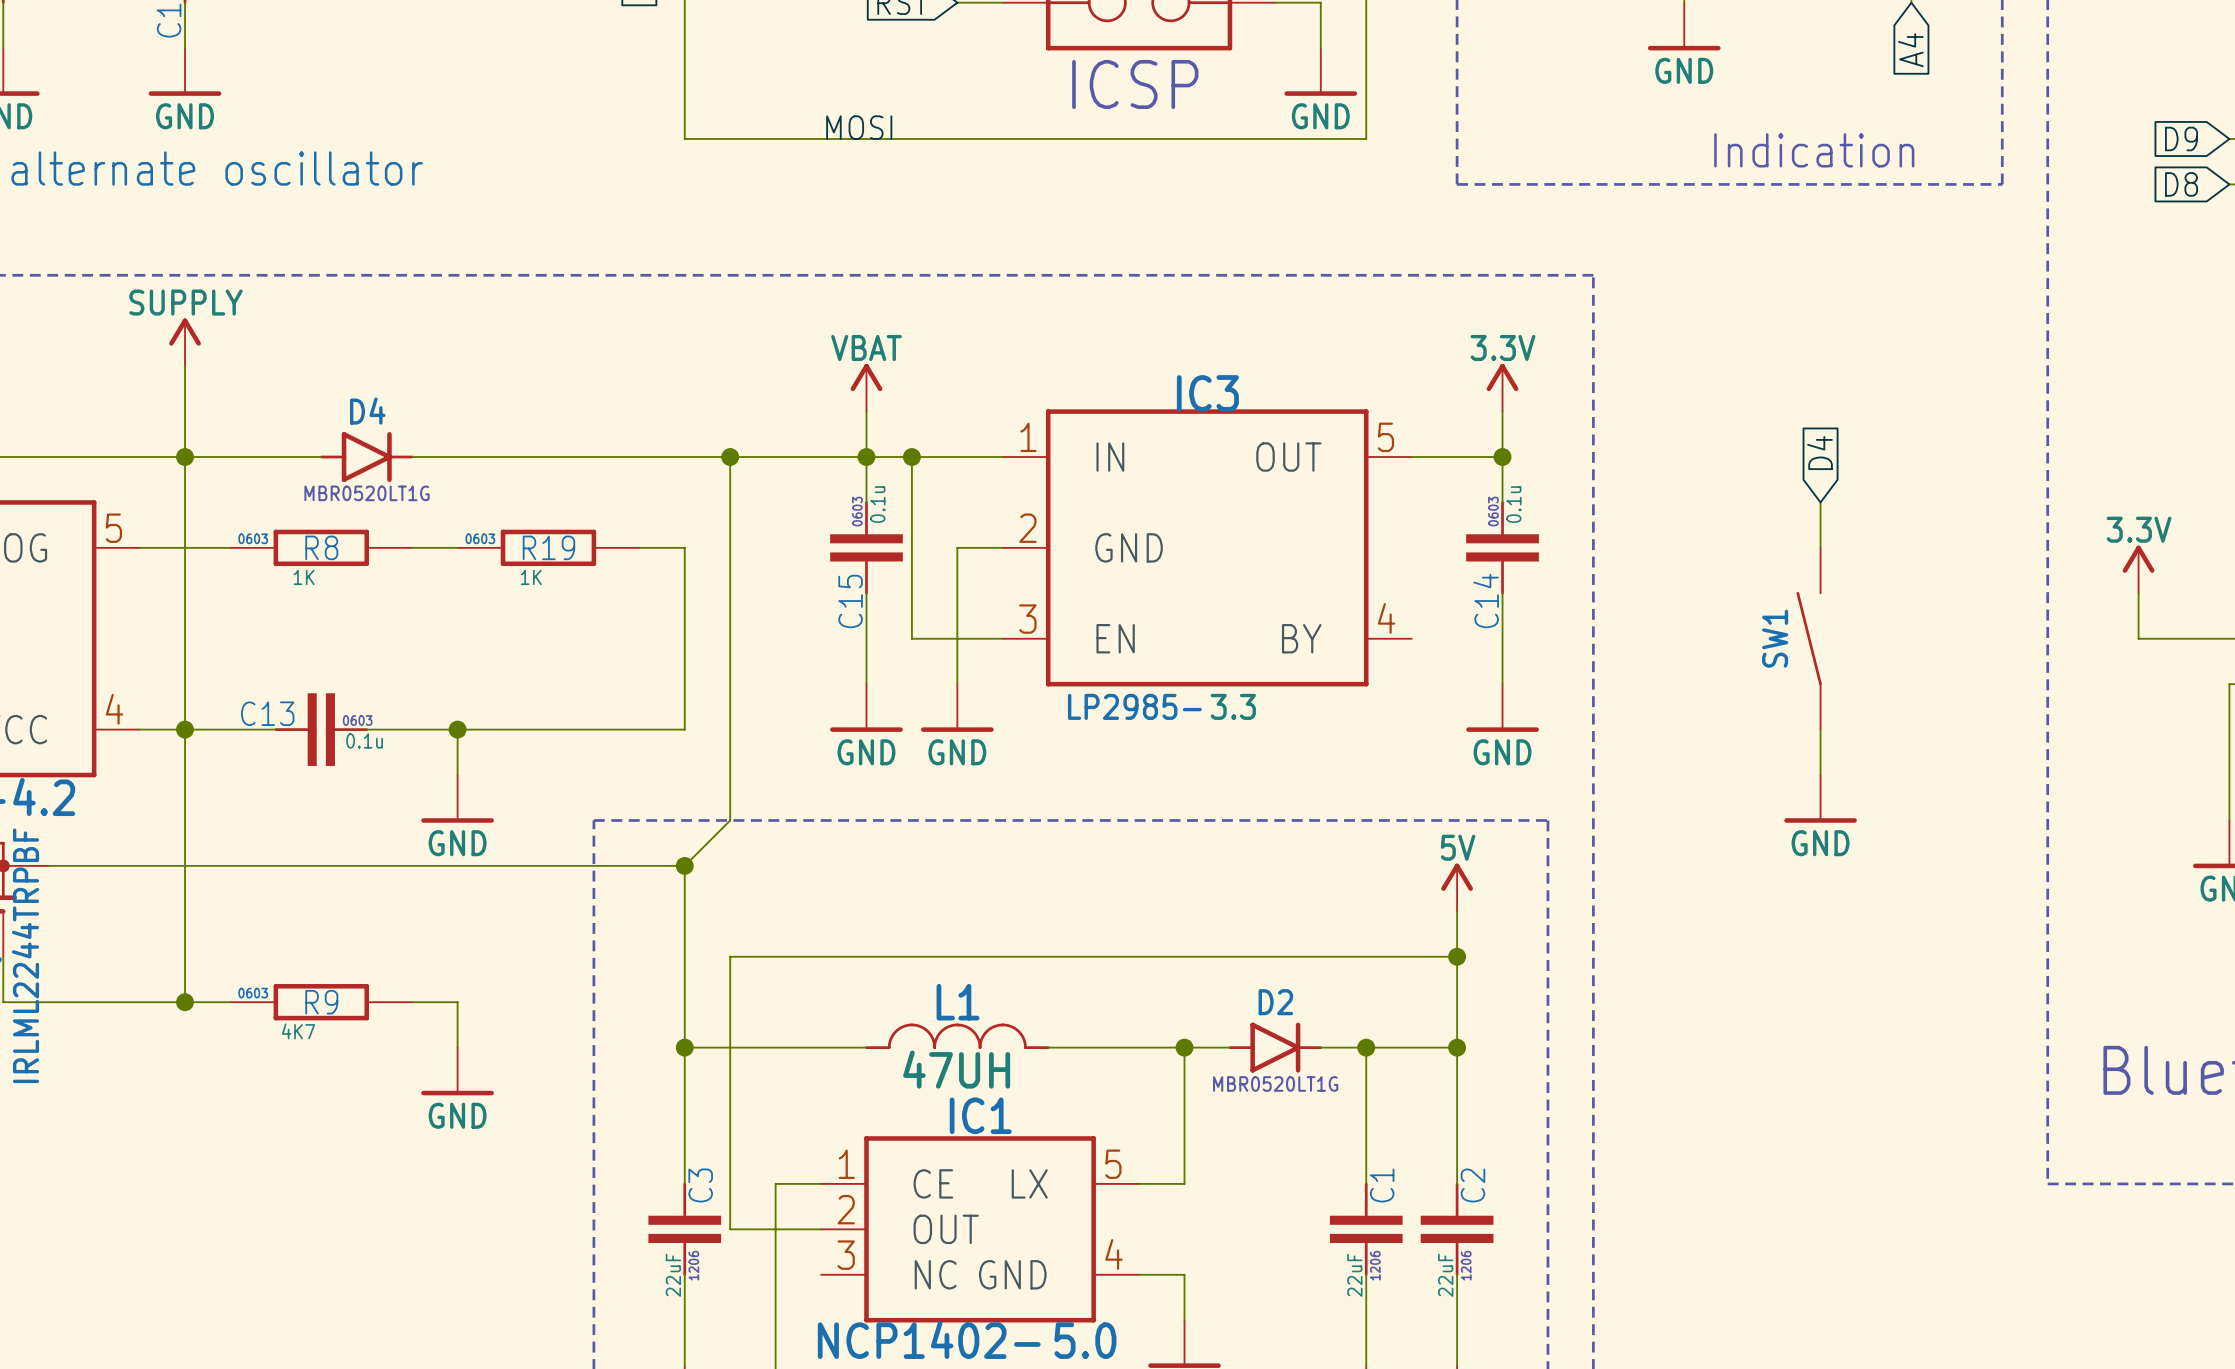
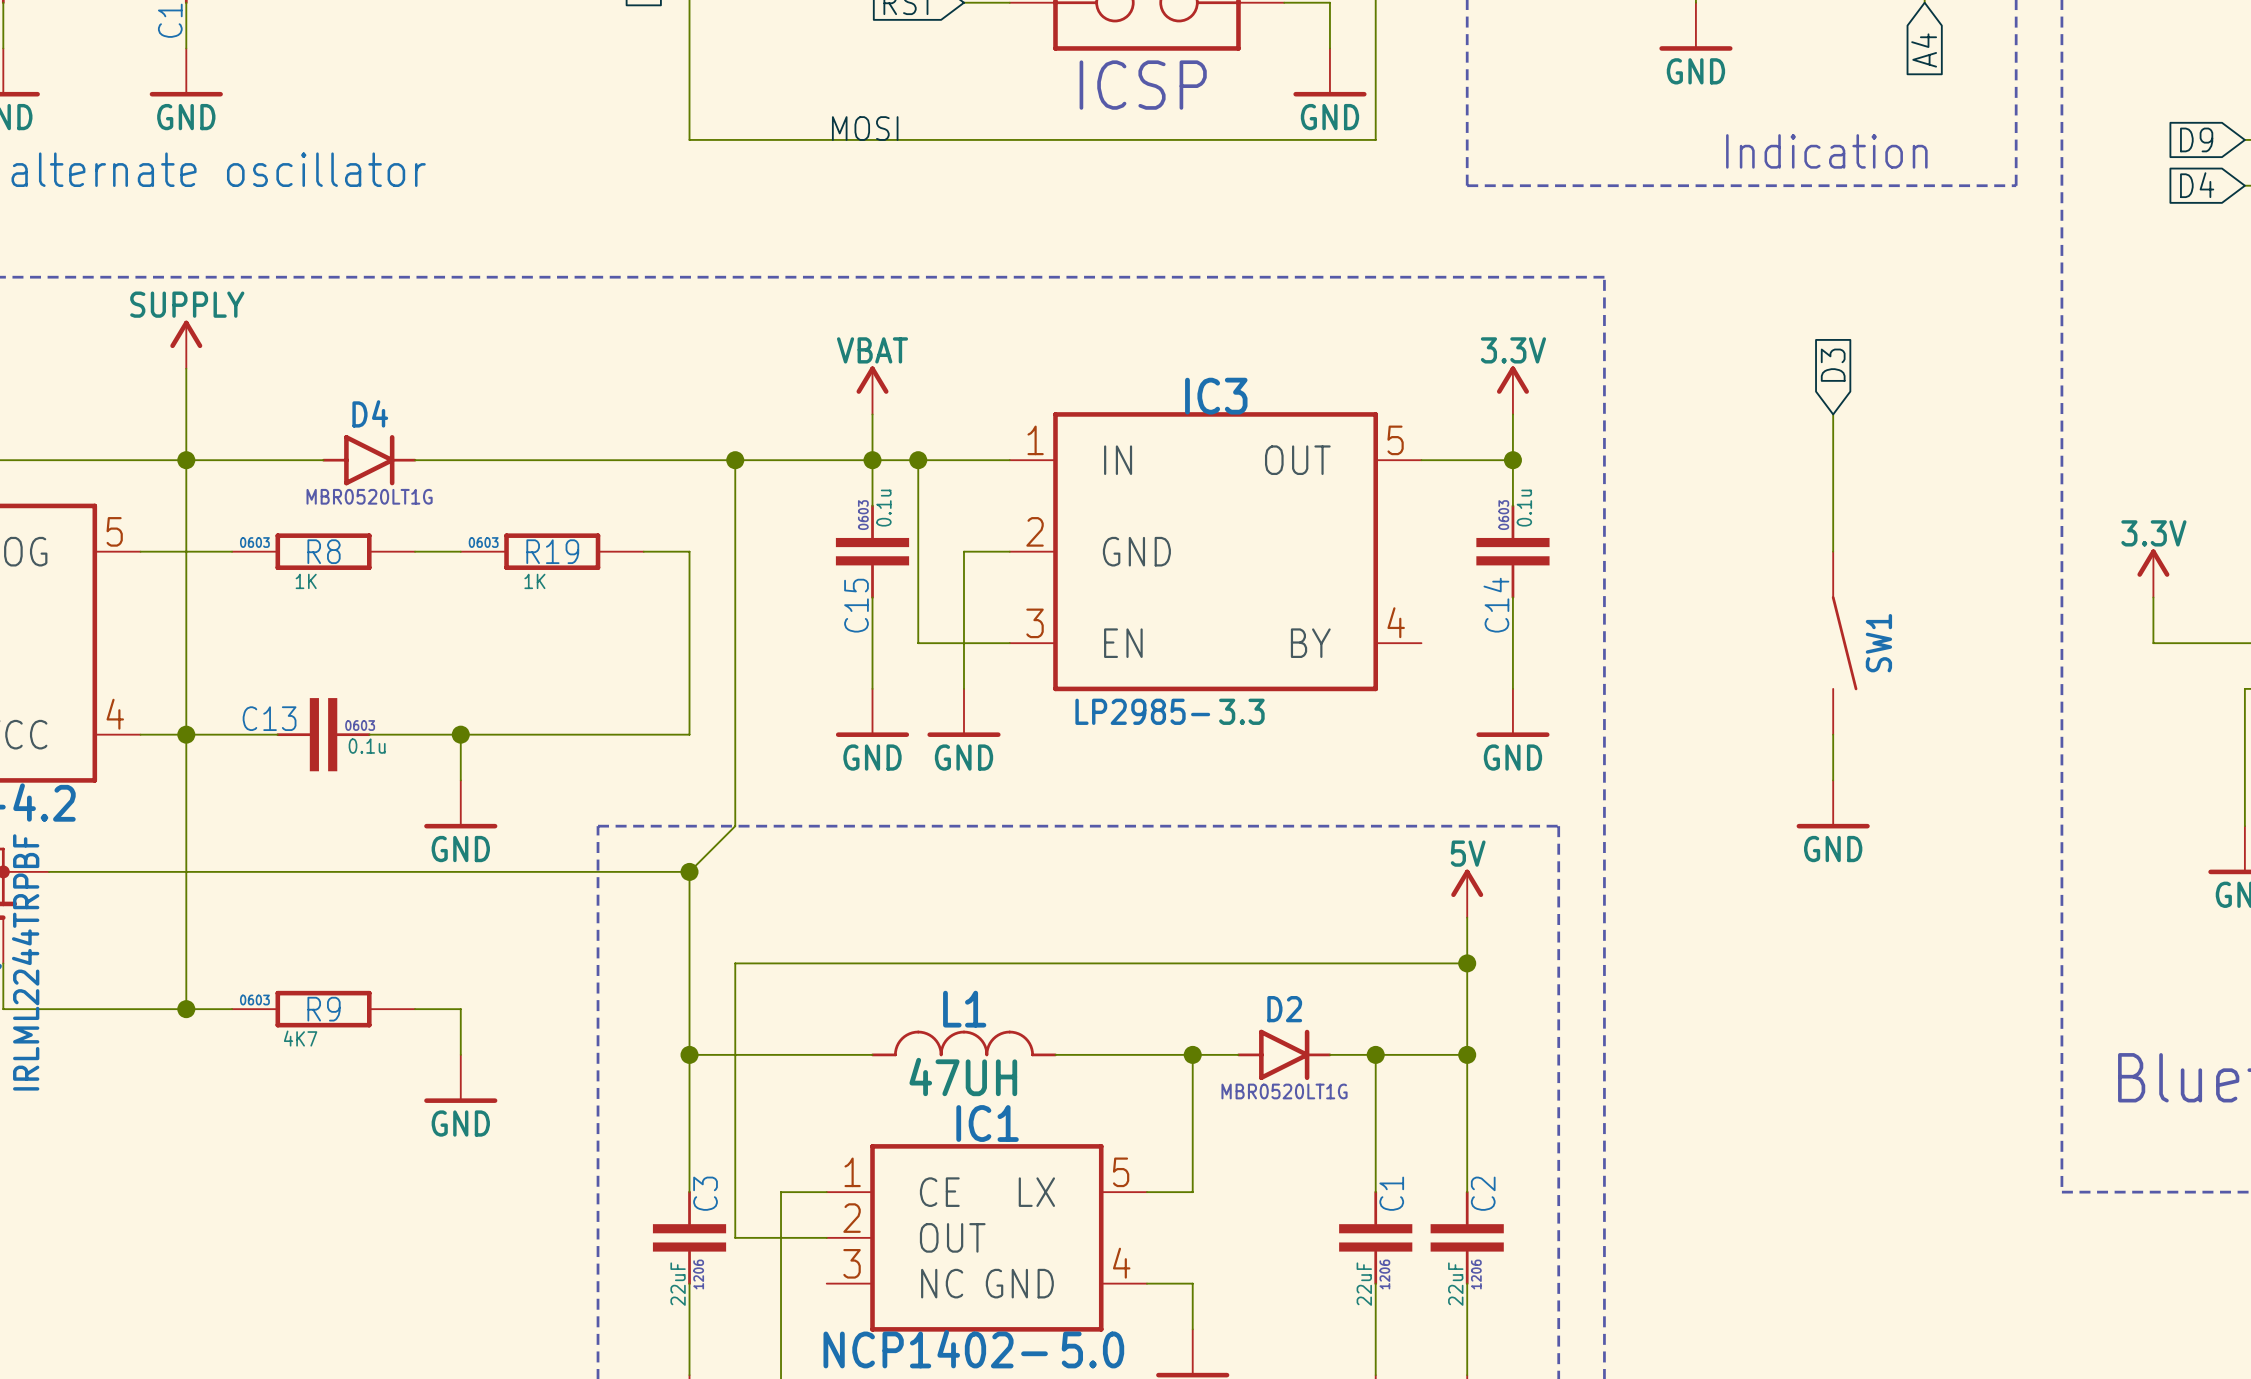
global label: D8 (2181, 184) -> D4 (2197, 185)
global label: none -> D3 (1833, 365)
wire: none -> (1833, 414) (1833, 505)
global label: D4 (1820, 453) -> none
SW1 rotation: 0° (1809, 638) -> 180° (1844, 643)

